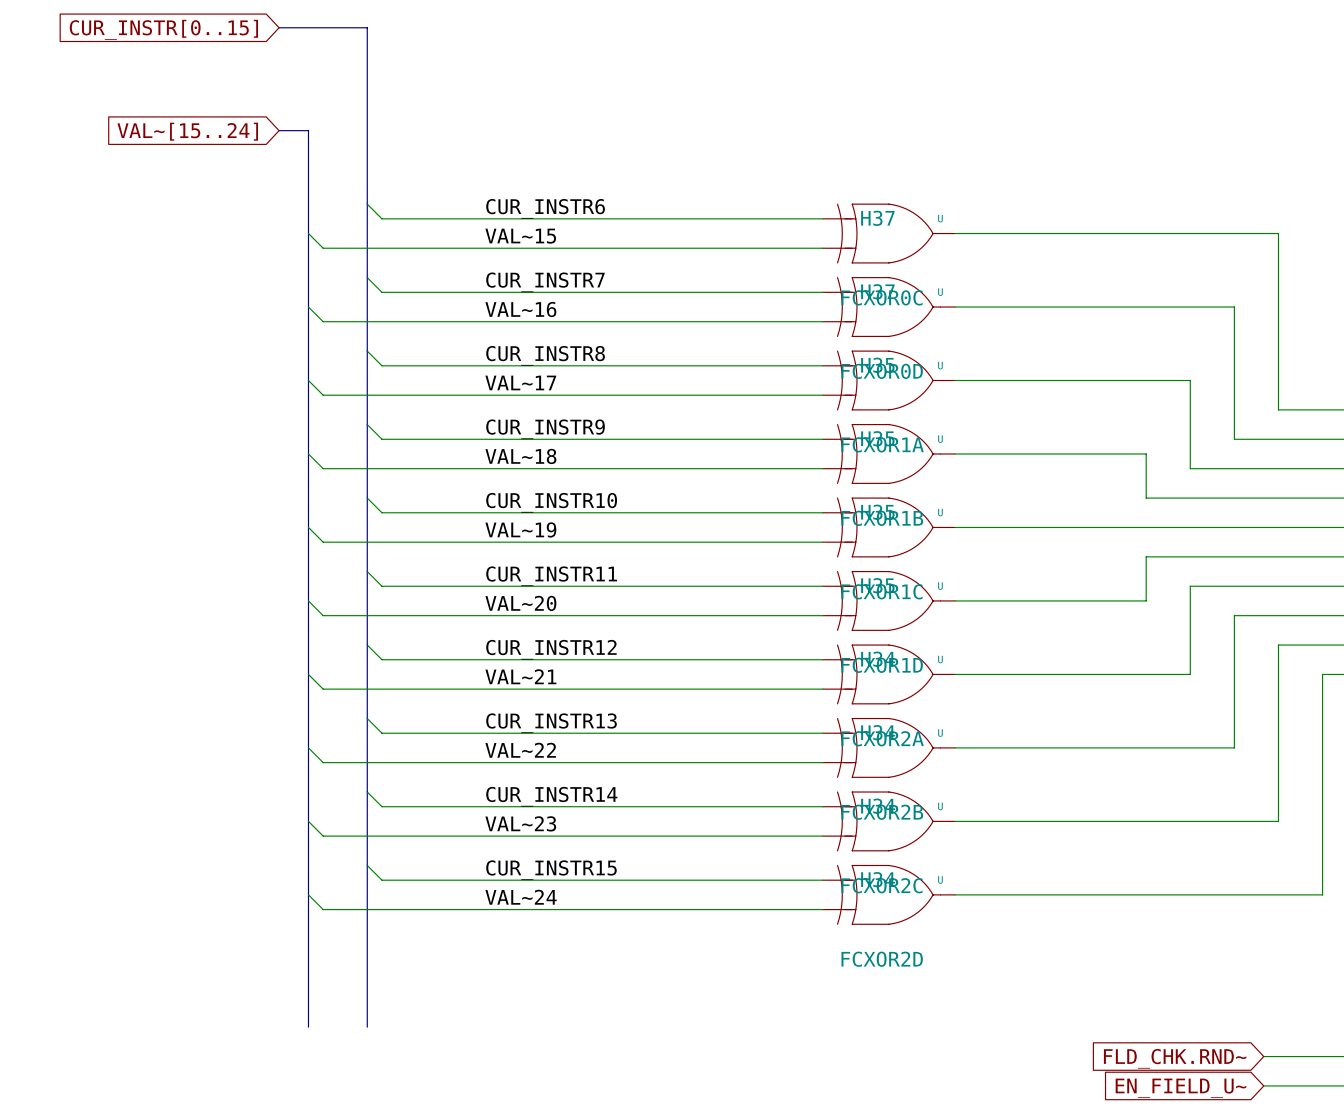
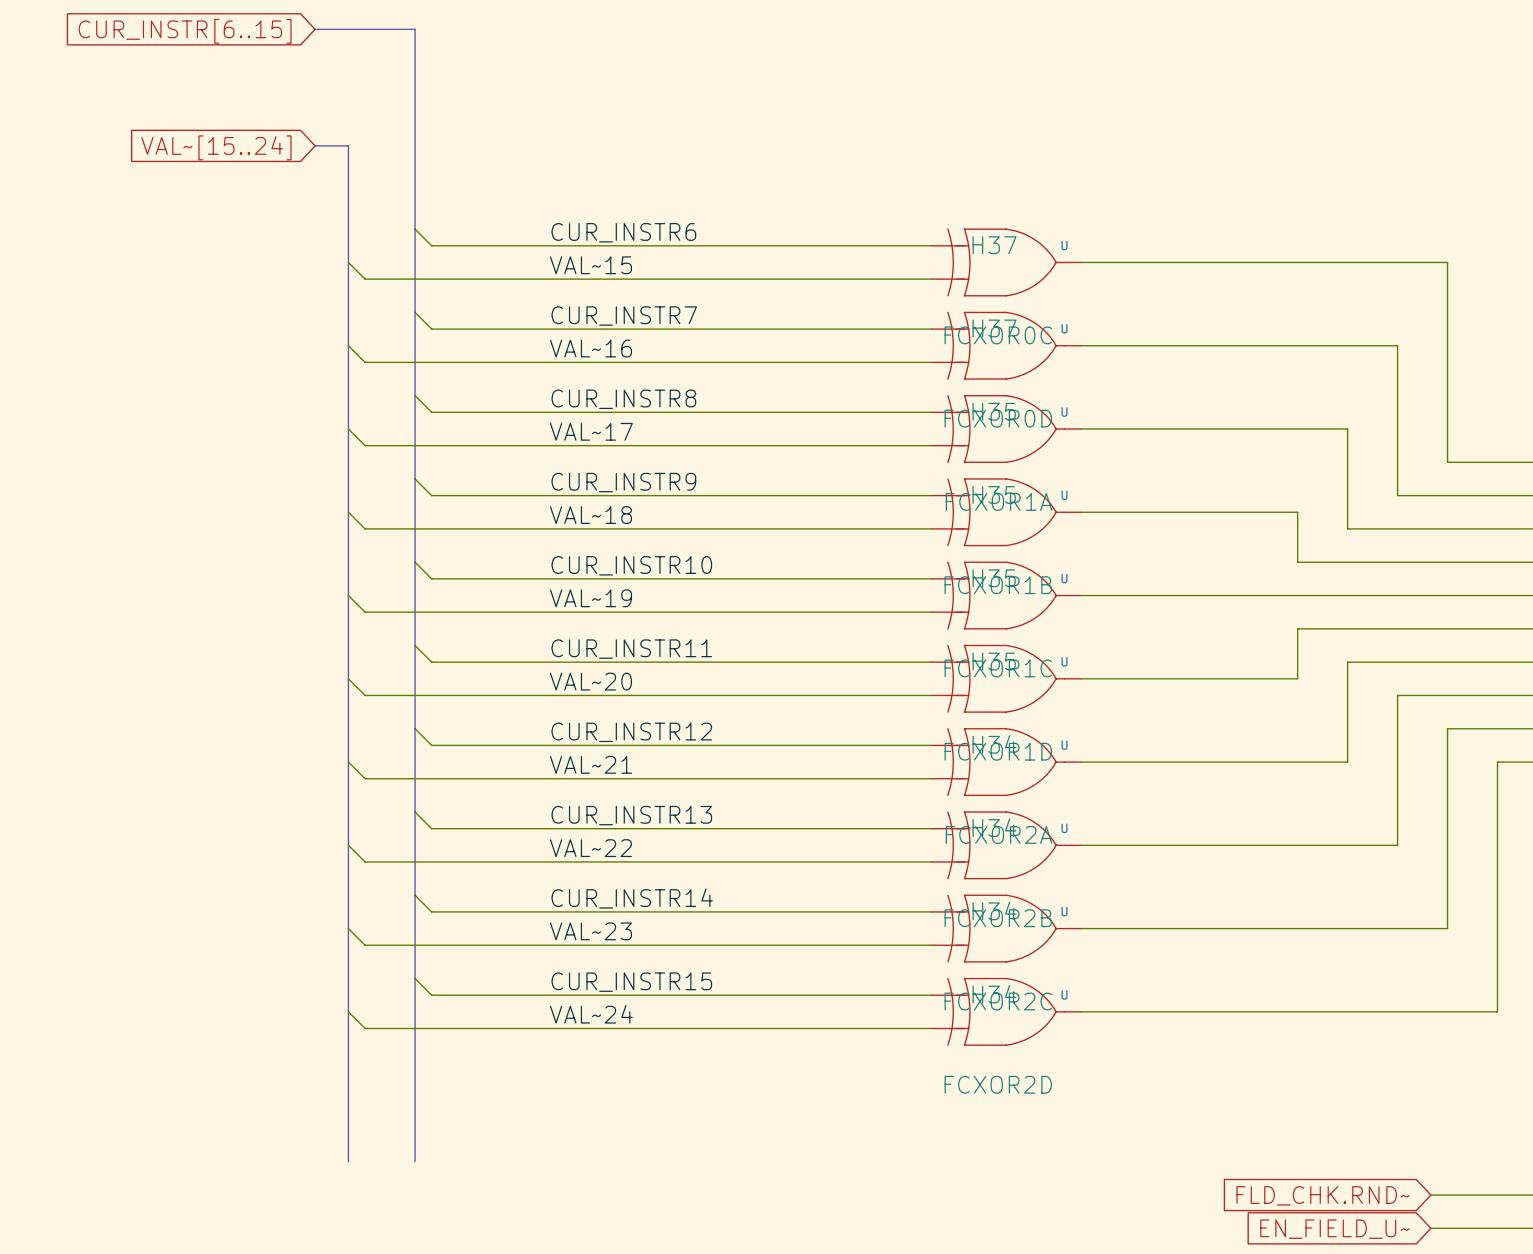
global label: CUR_INSTR[0..15] (163, 29) -> CUR_INSTR[6..15] (185, 31)

